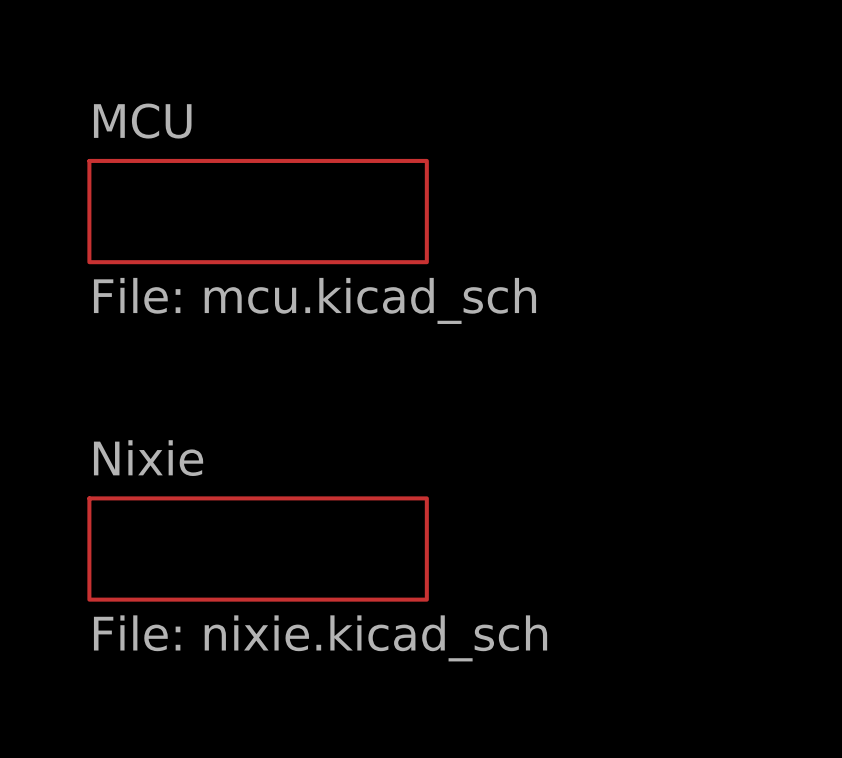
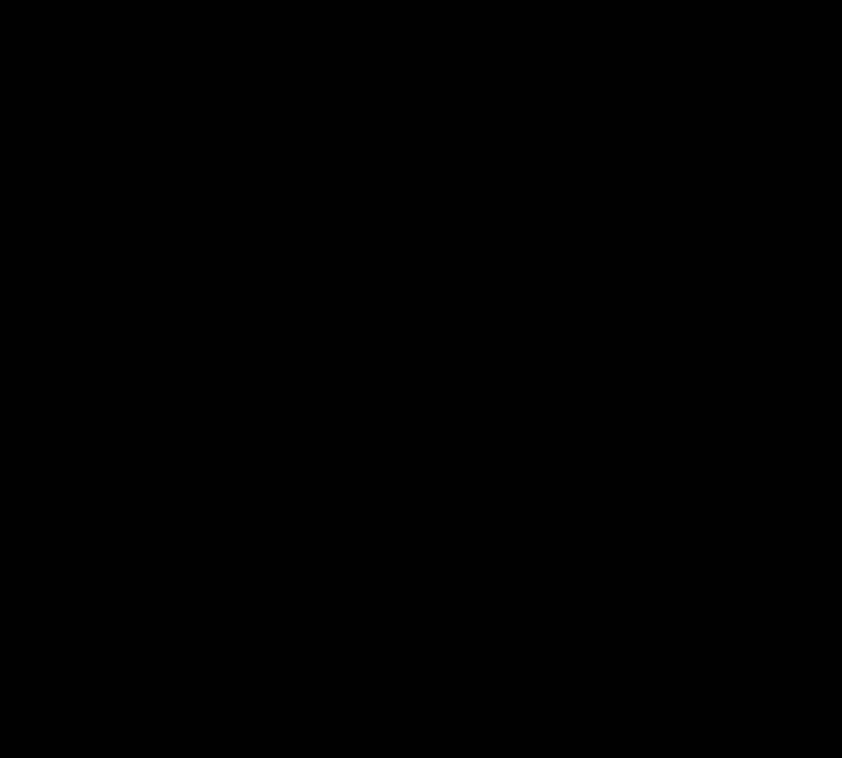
sheet MCU: File: mcu.kicad_sch (258, 211) -> none
sheet Nixie: File: nixie.kicad_sch (258, 549) -> none

